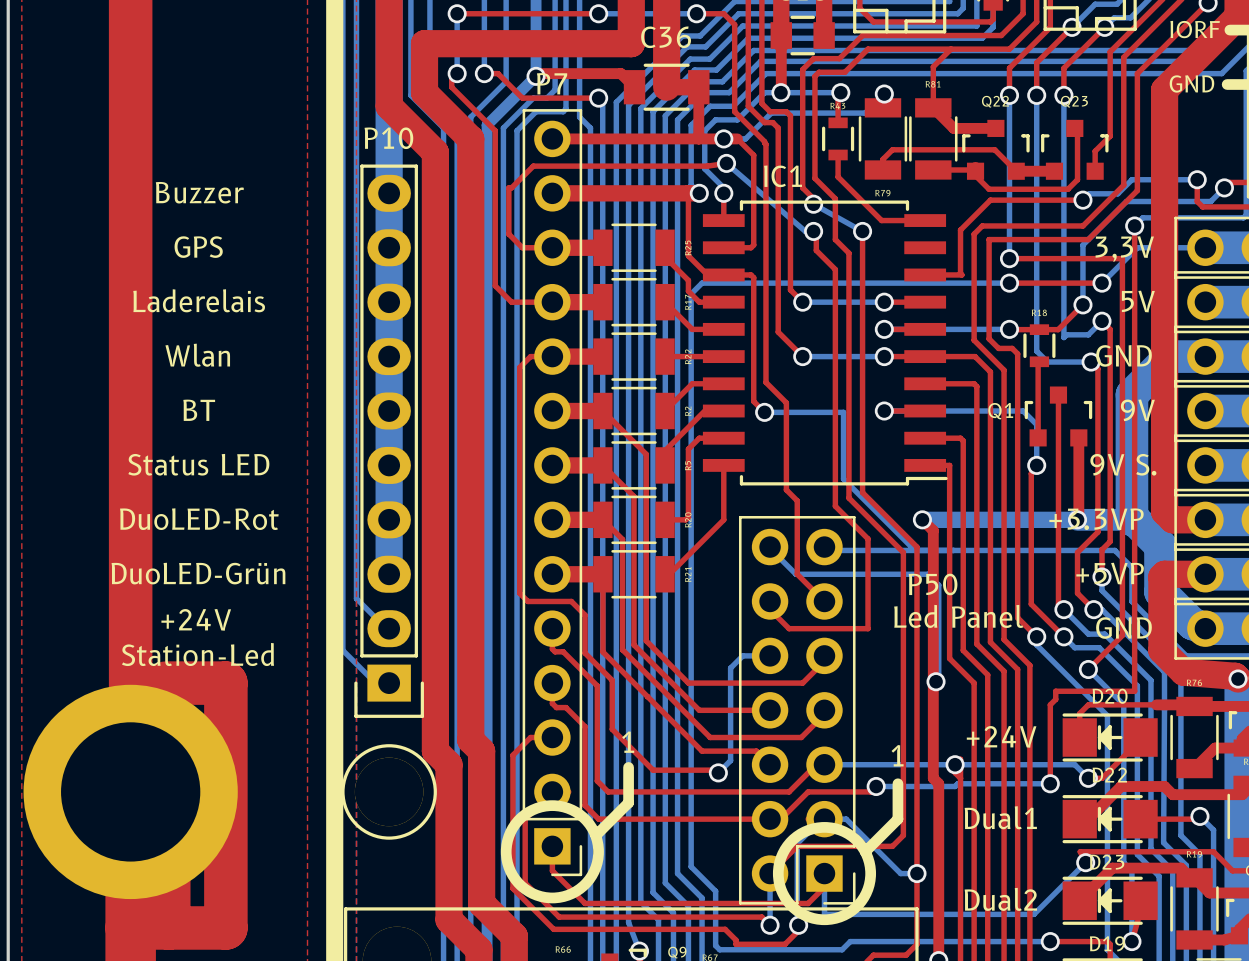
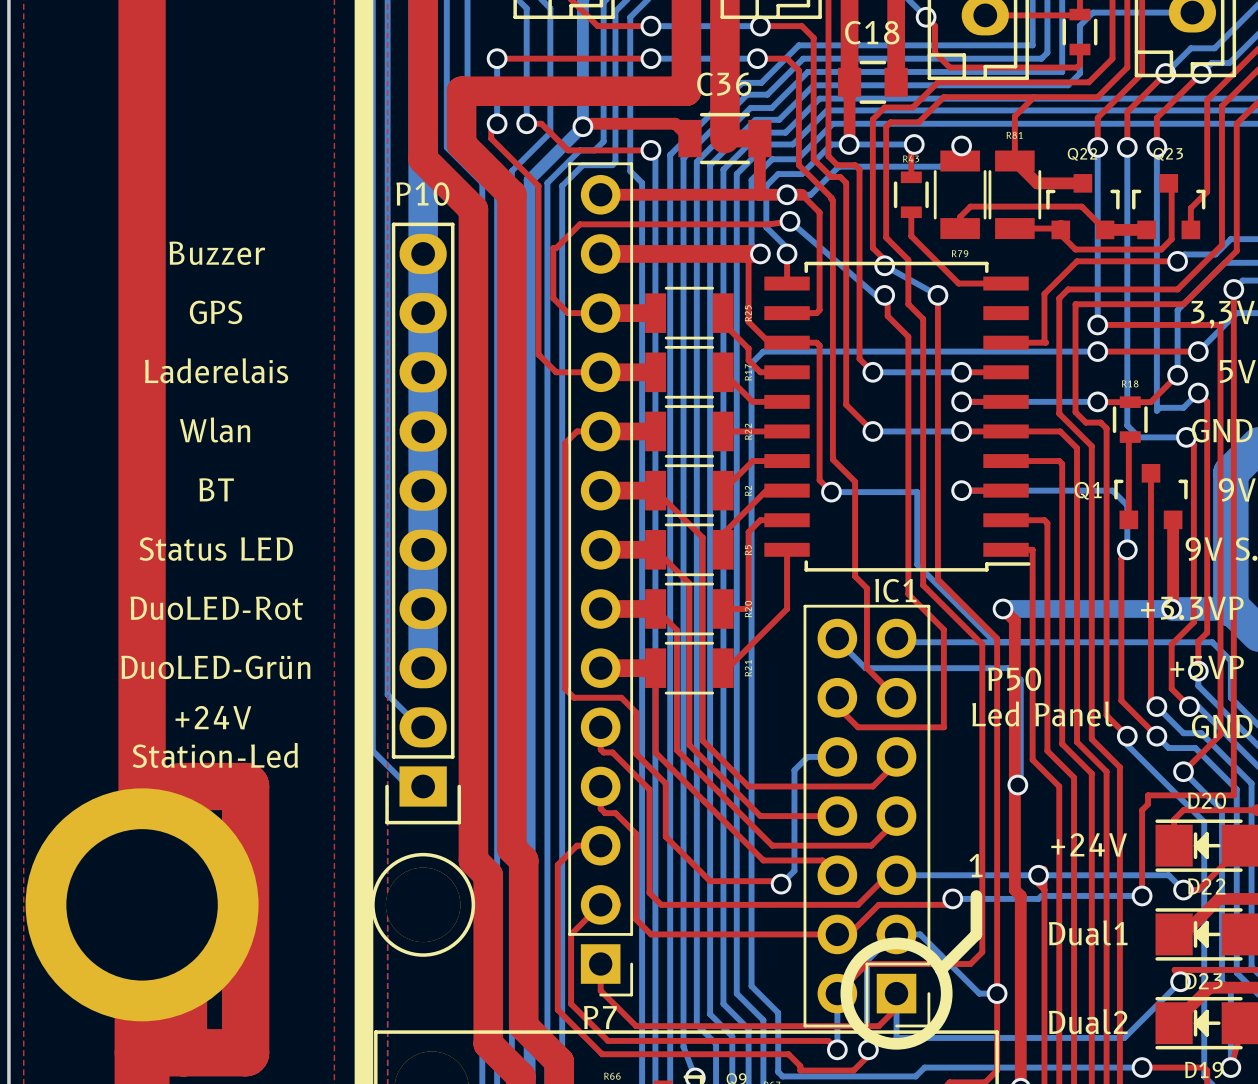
P7 name position: P7 (552, 83) -> P7 (600, 1017)
IC1 name position: IC1 (783, 176) -> IC1 (895, 590)
text: 1 (628, 742) -> none
line: (628, 767) (628, 802) (595, 835) -> none
drawing: [500, 800, 604, 904] -> none

